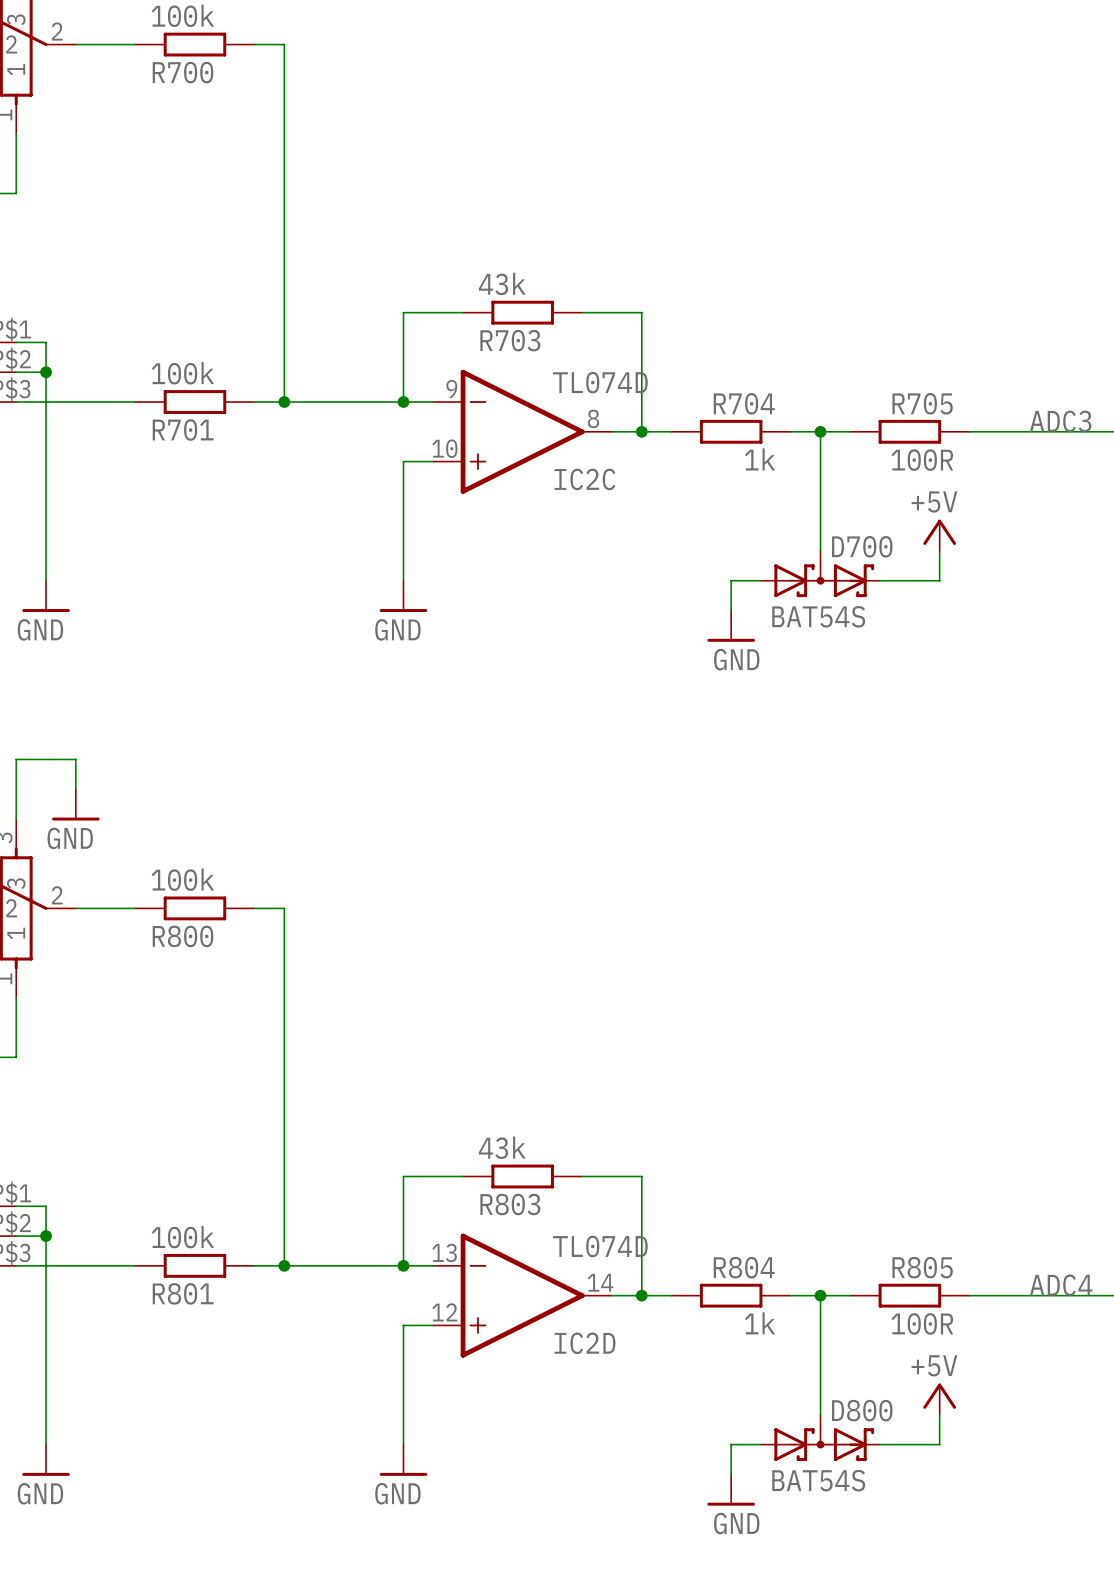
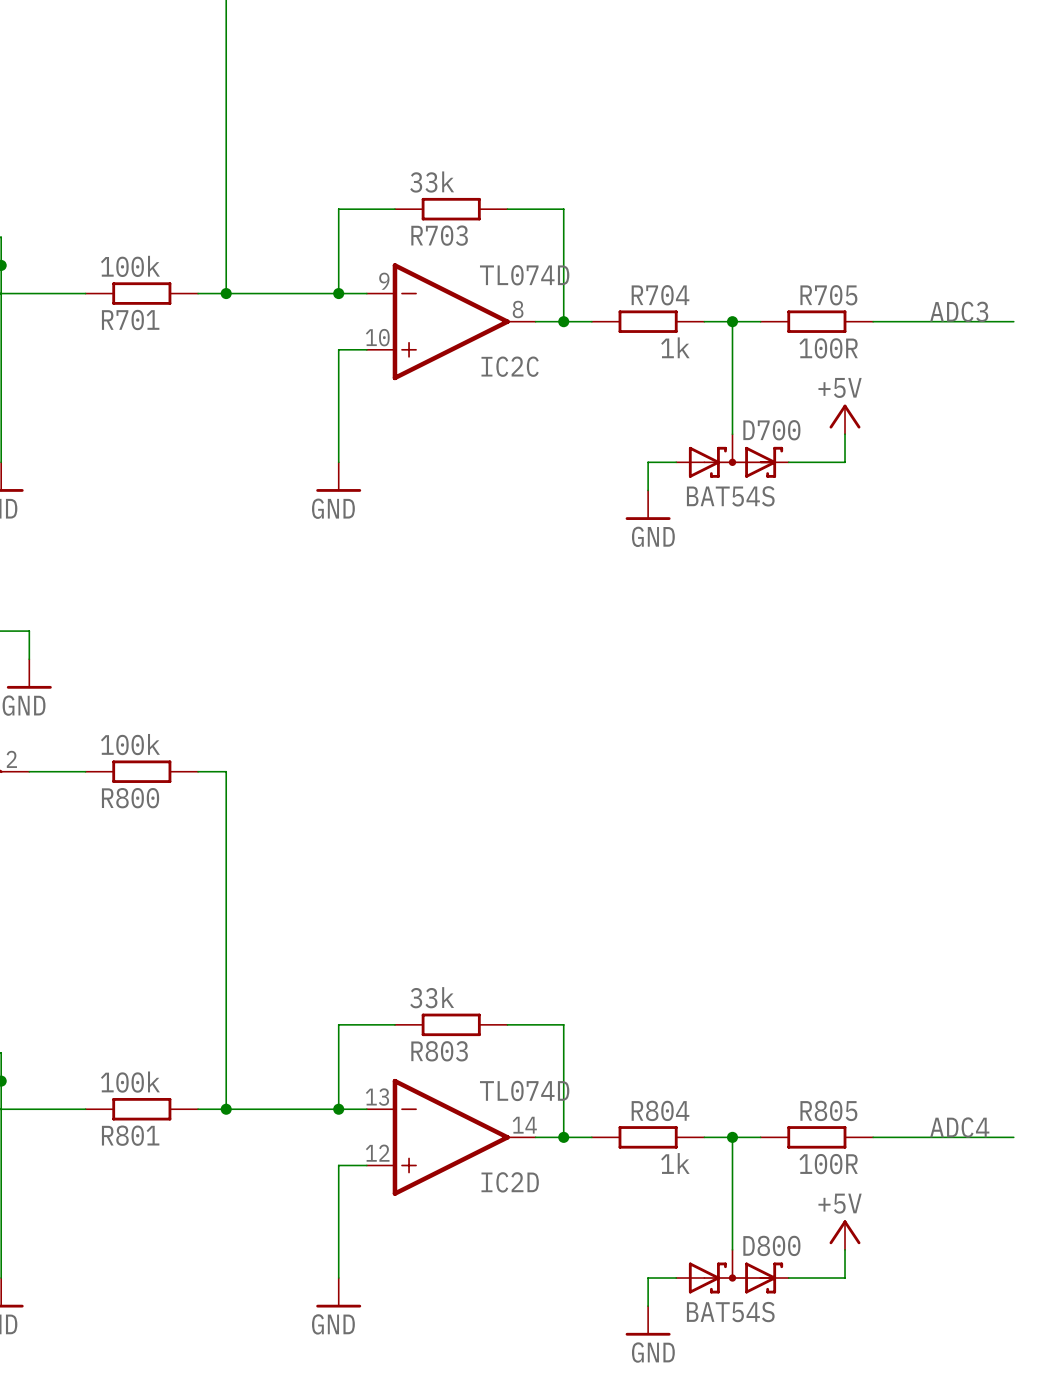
R703 value: 43k (502, 283) -> 33k (432, 182)
R803 value: 43k (502, 1147) -> 33k (432, 997)

